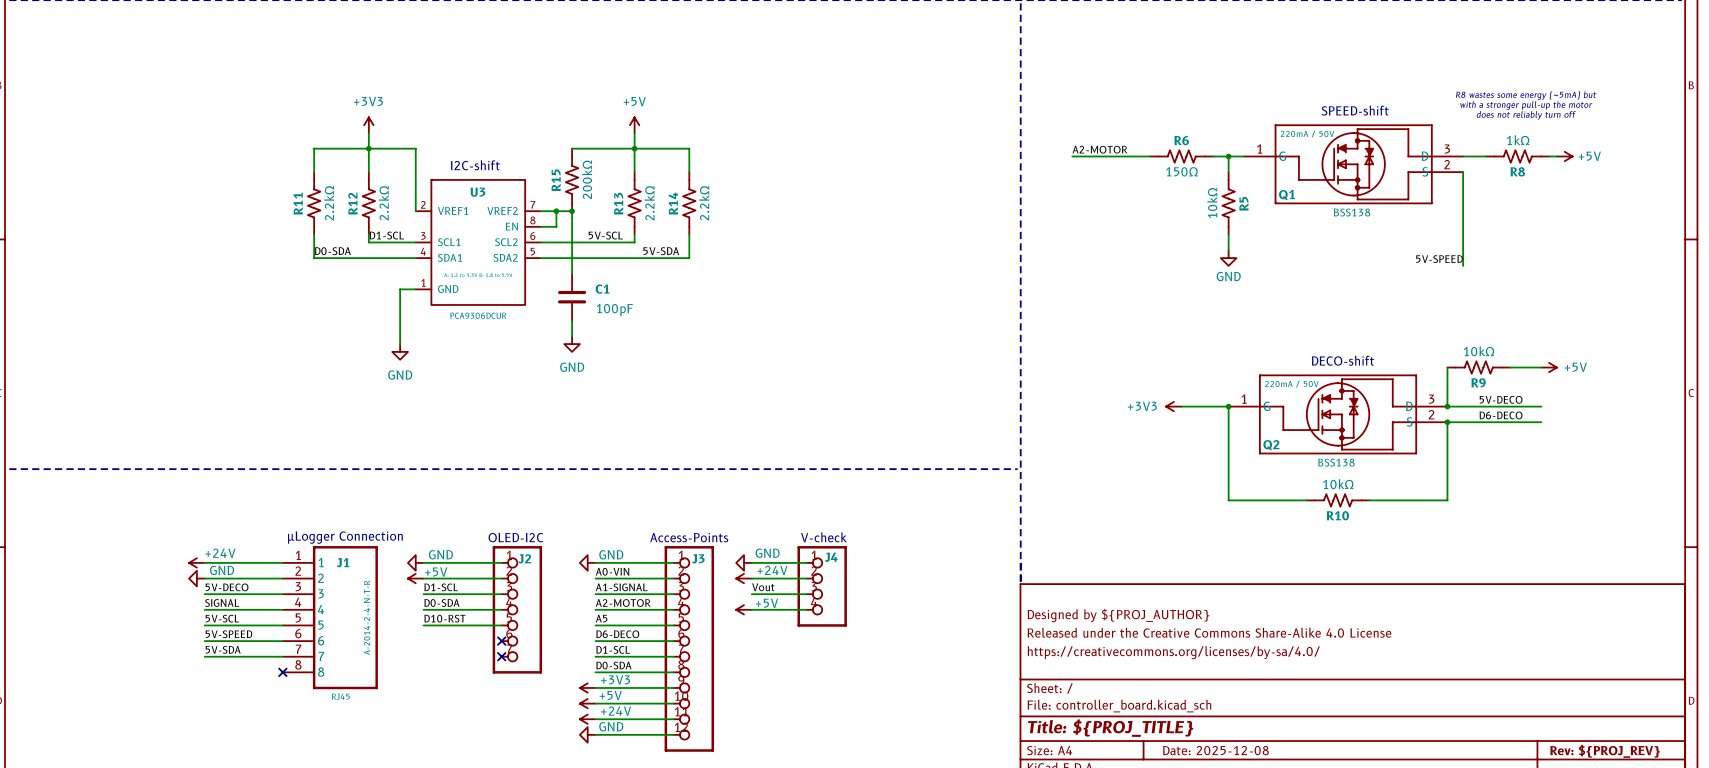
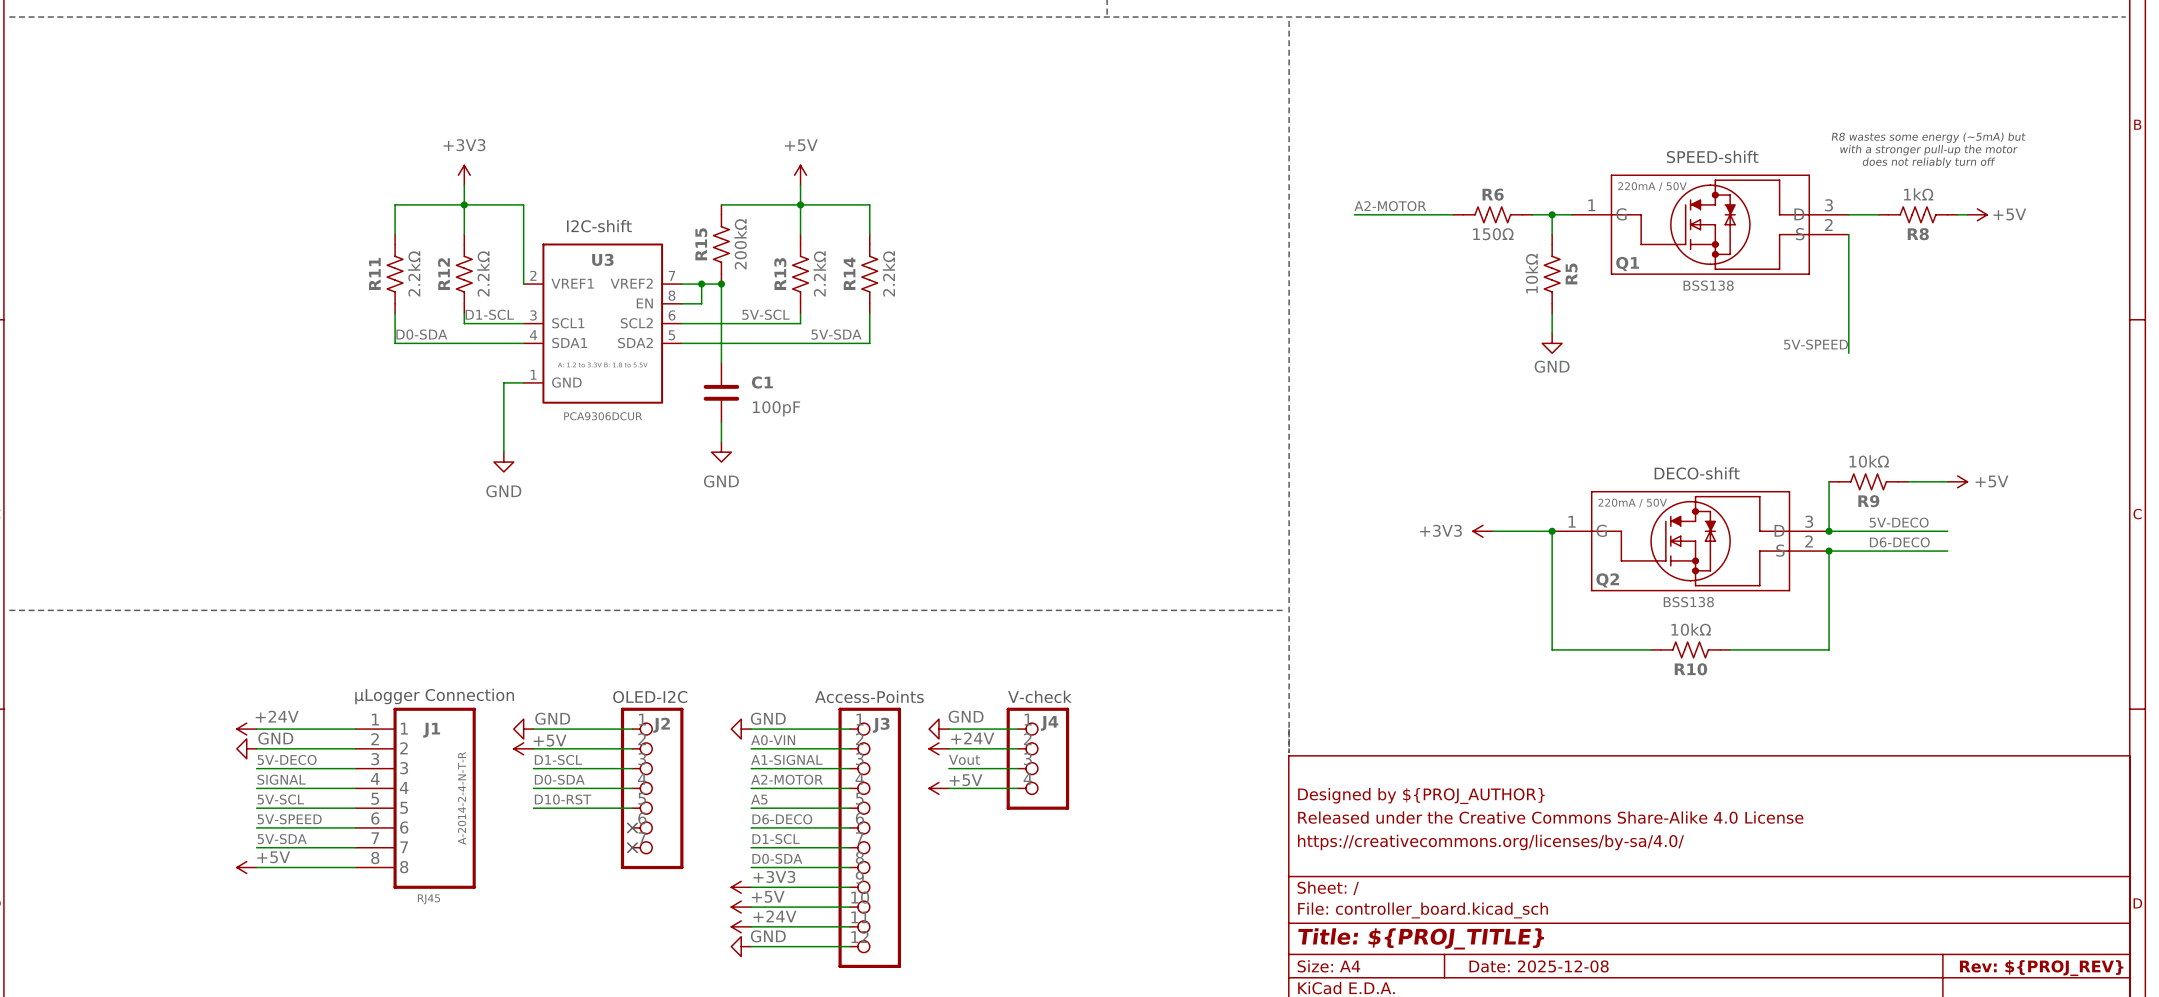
power symbol: none -> +5V (246, 867)
wire: none -> (256, 867) (355, 867)
no-connect mark: (282, 672) -> none

